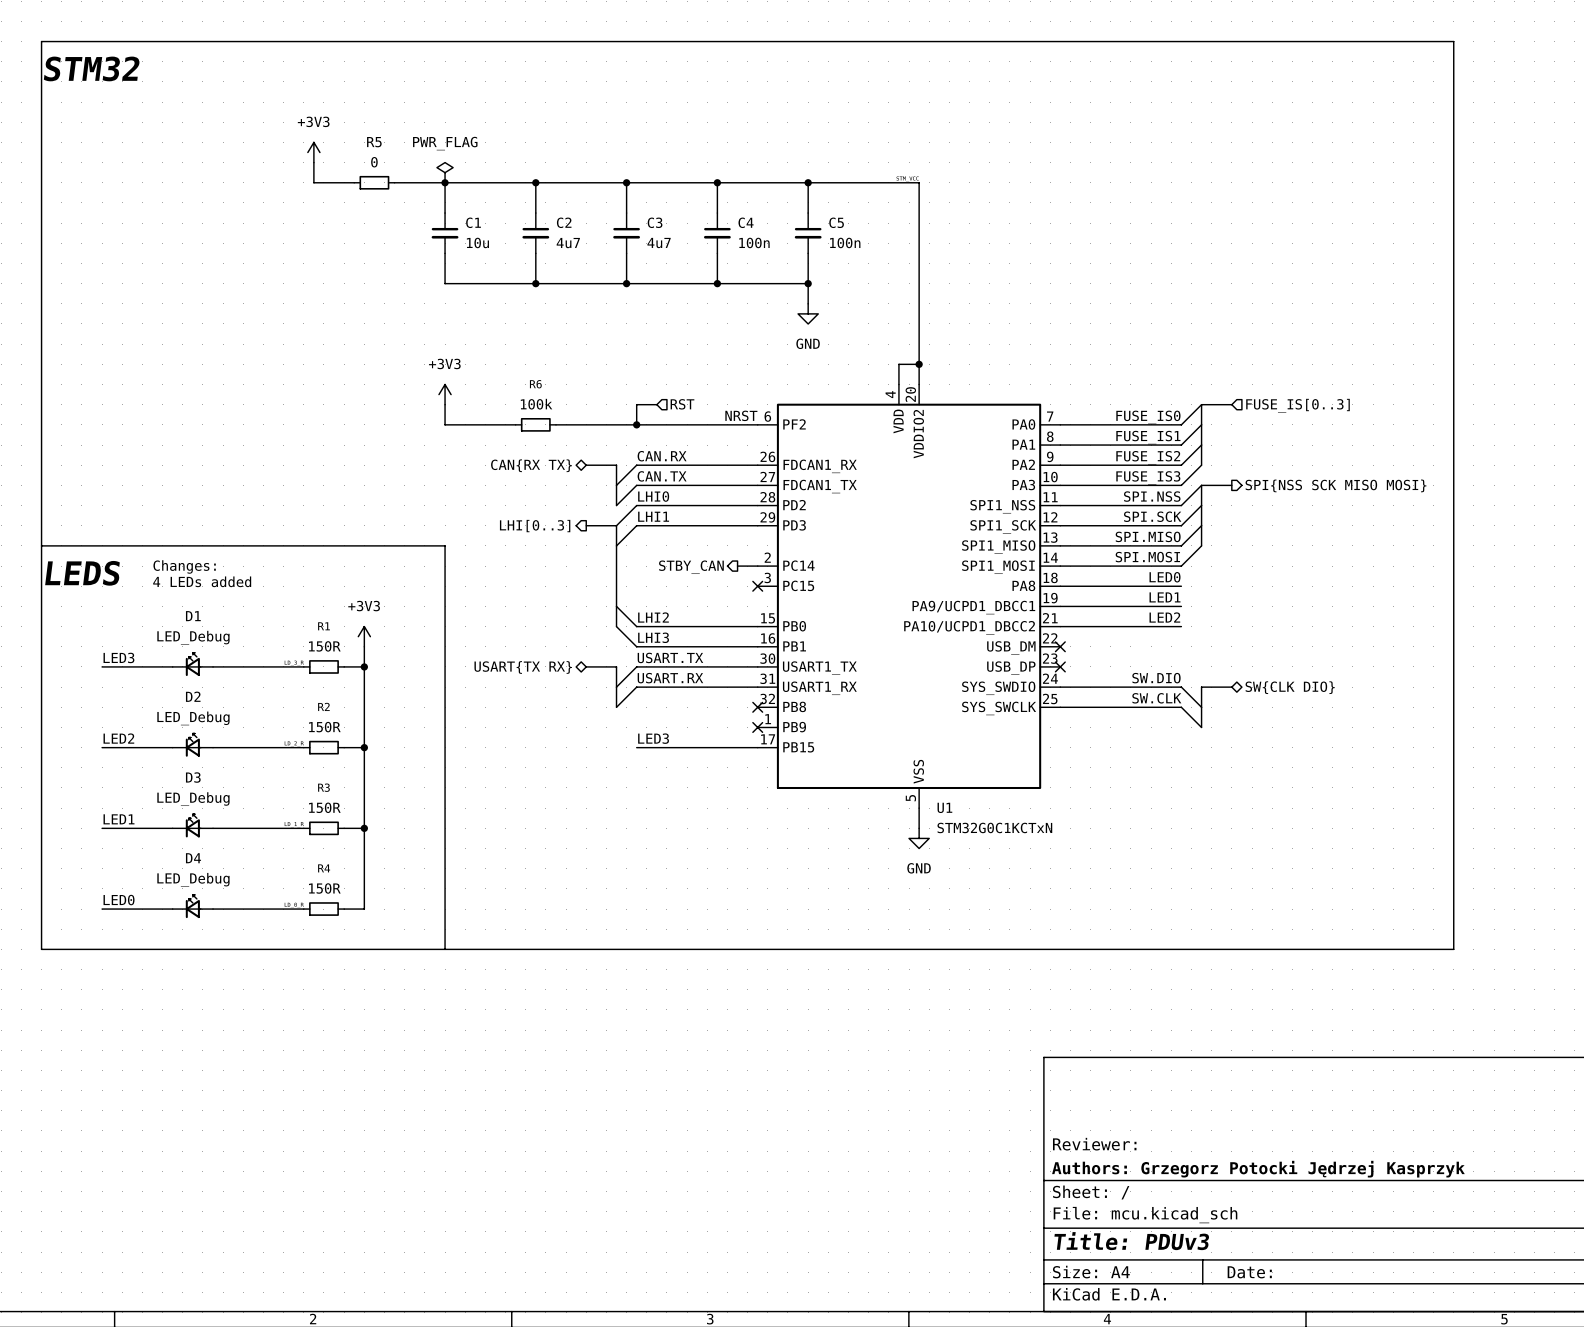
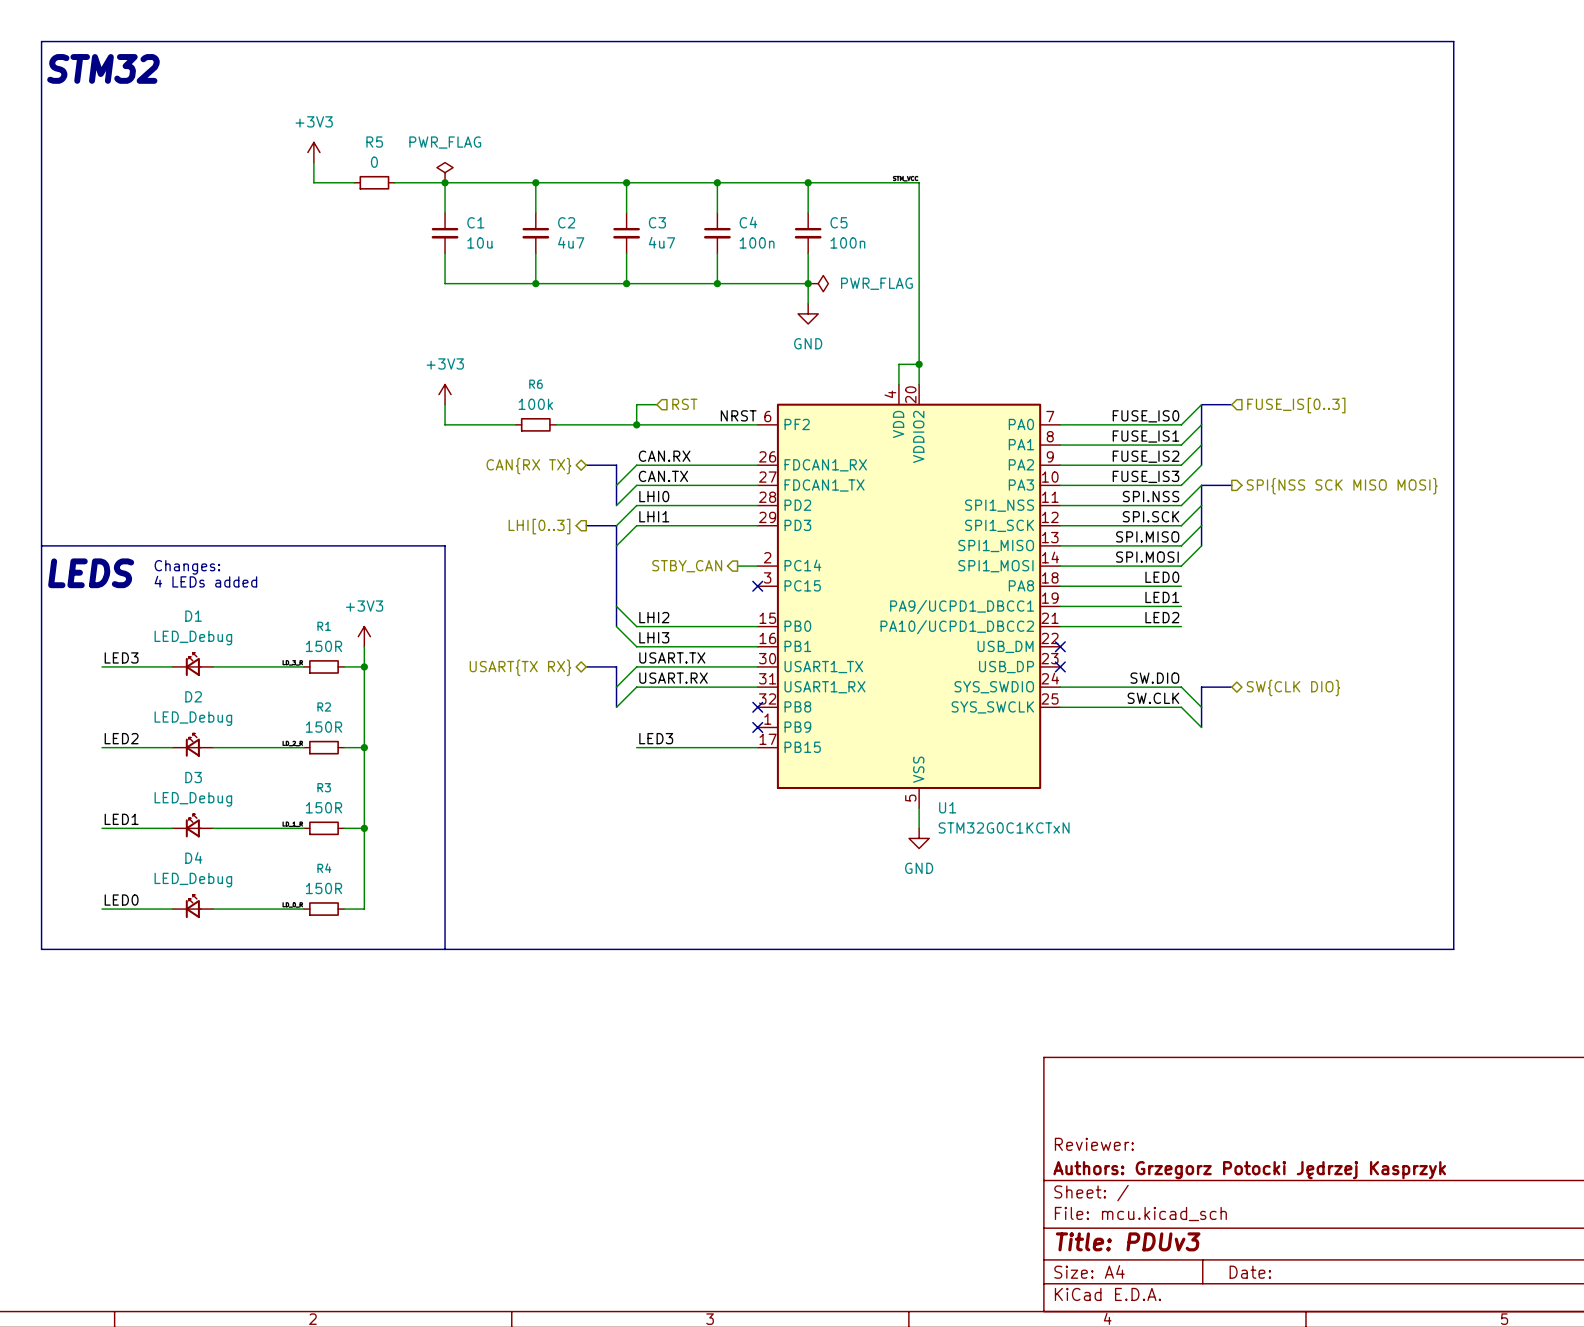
power symbol: none -> PWR_FLAG (818, 283)

